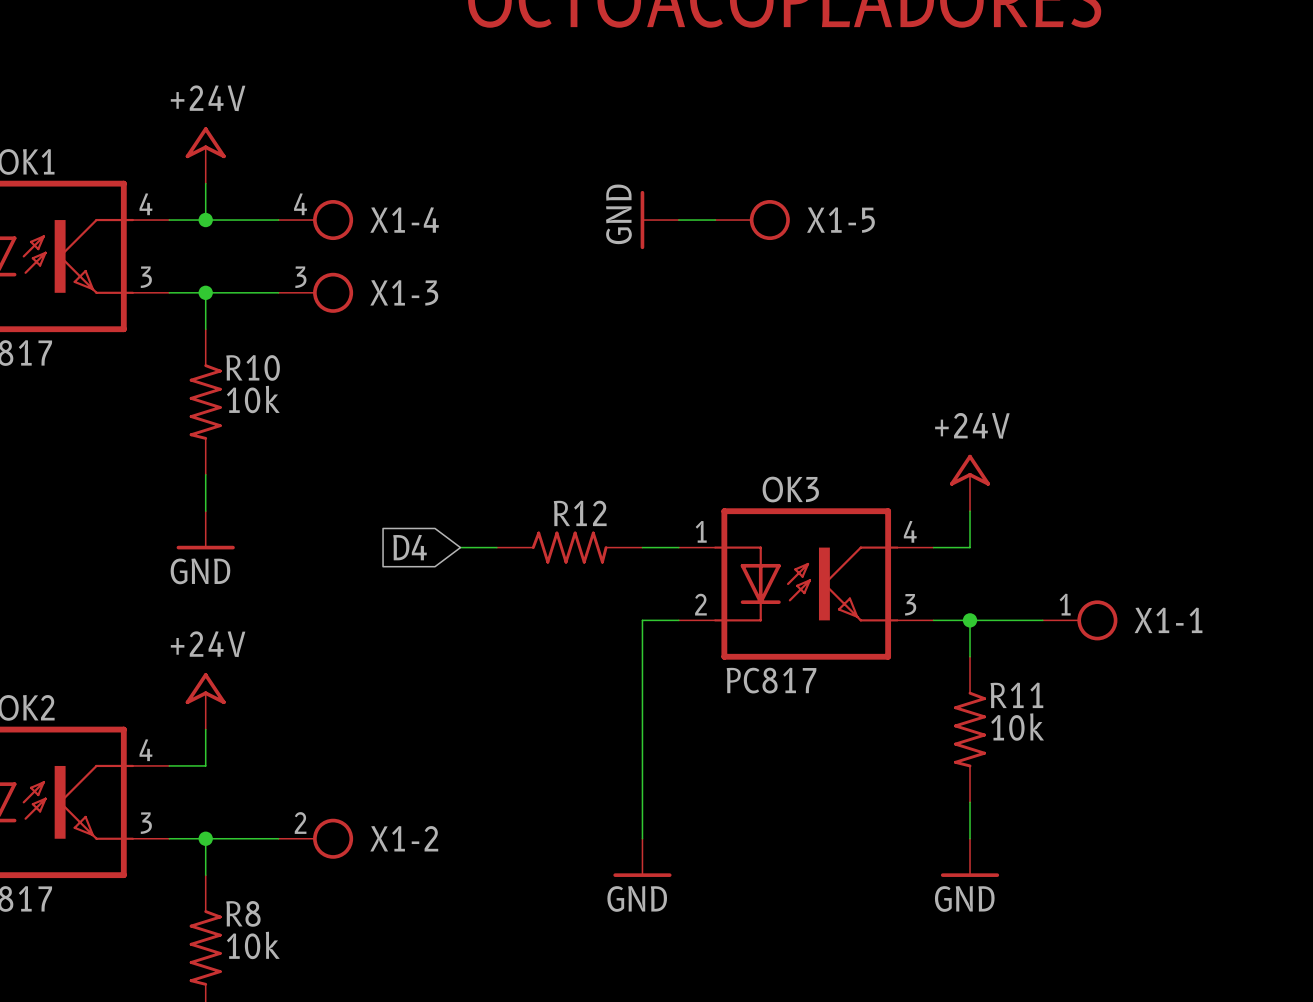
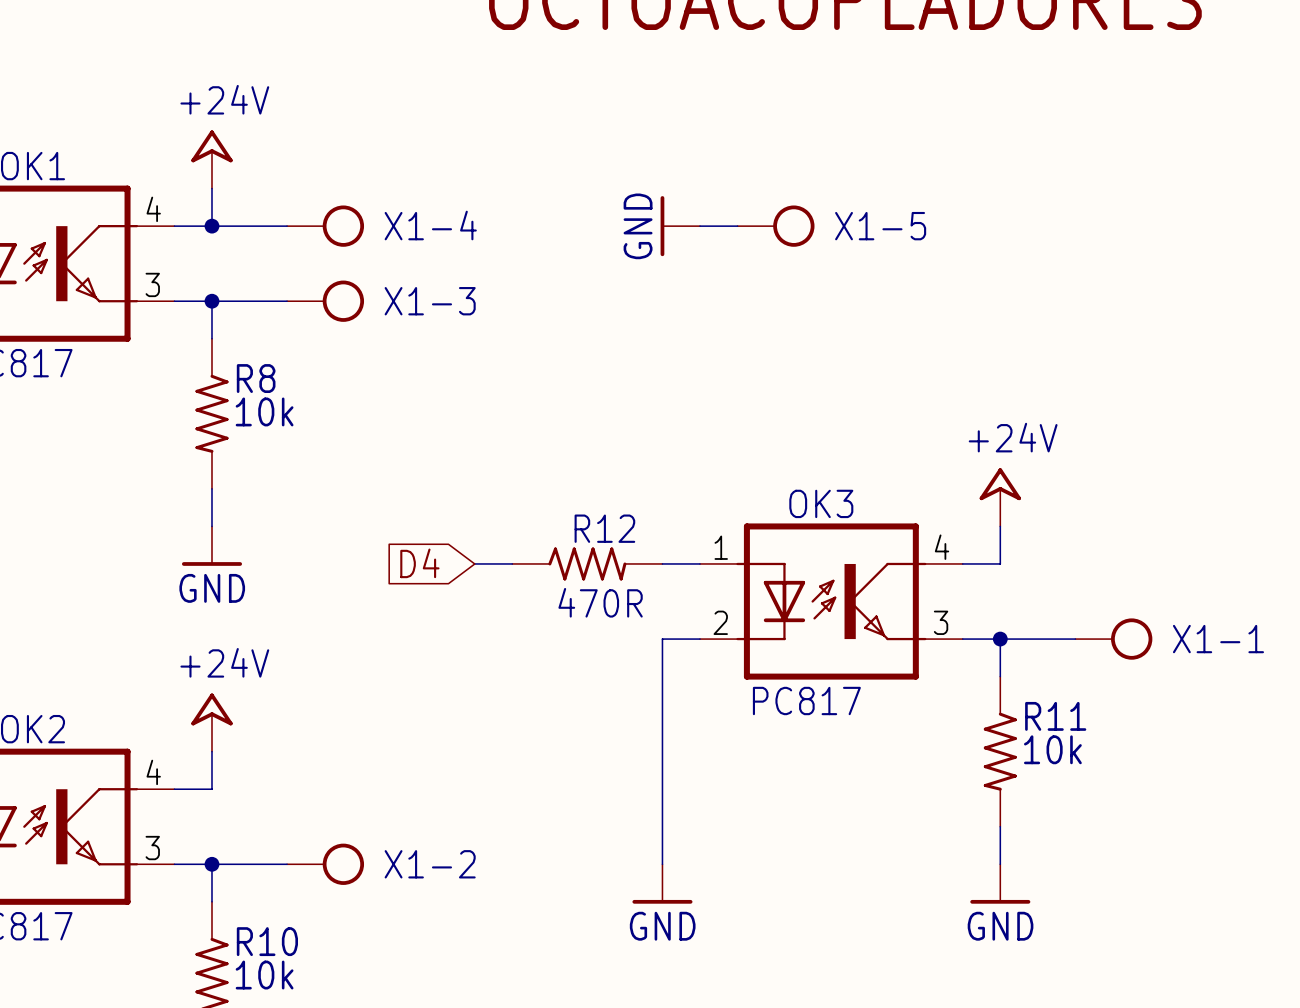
X1-4 pin number: 4 (300, 204) -> none
X1-3 pin number: 3 (300, 277) -> none
R10 name: R10 (253, 367) -> R8 (256, 378)
R12 value: none -> 470R (600, 602)
X1-1 pin number: 1 (1065, 604) -> none
X1-2 pin number: 2 (300, 823) -> none
R8 name: R8 (243, 913) -> R10 (267, 941)

